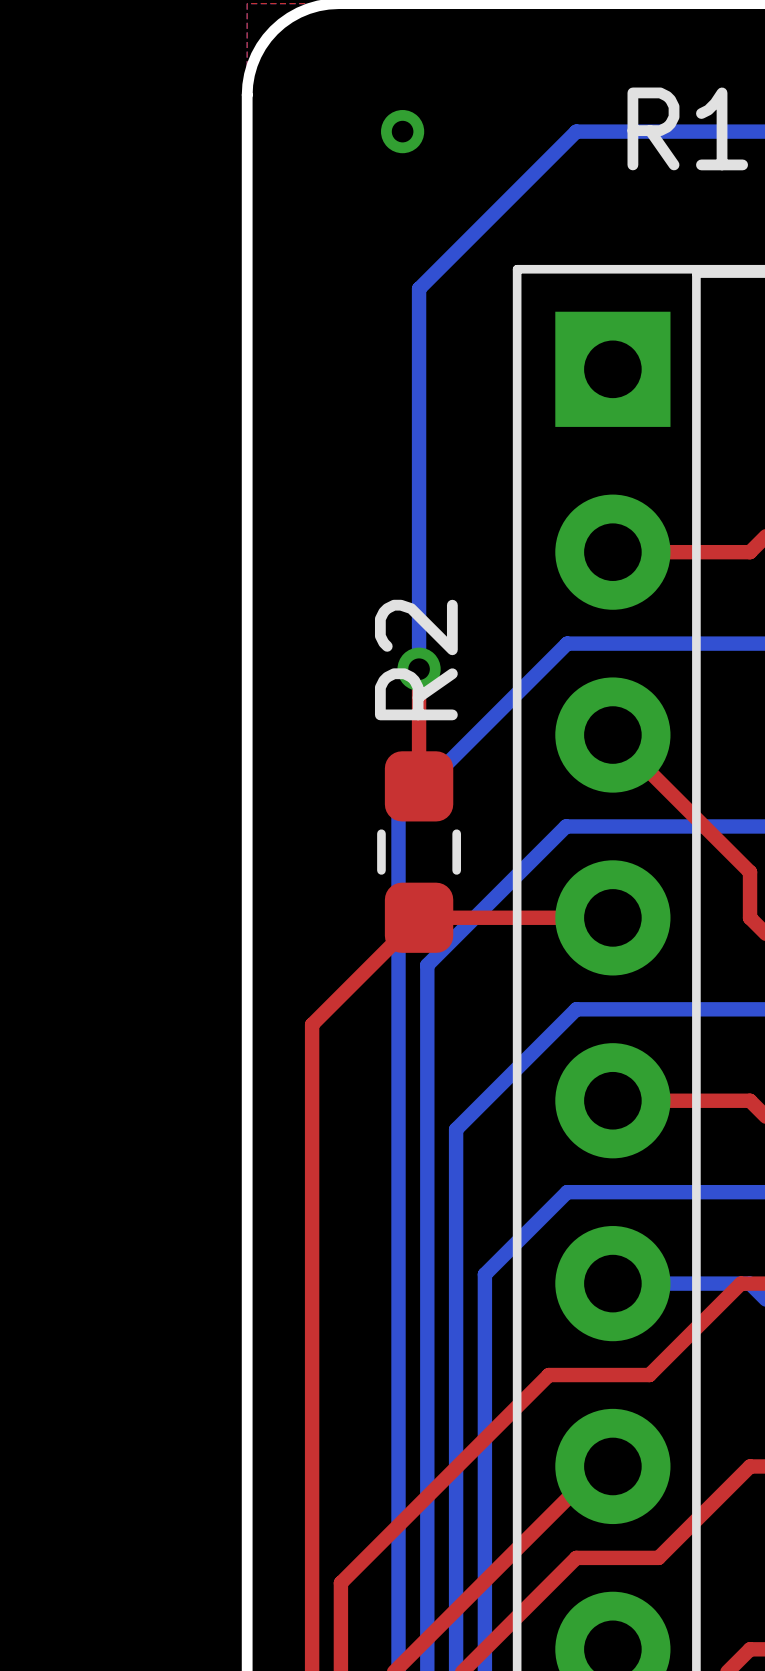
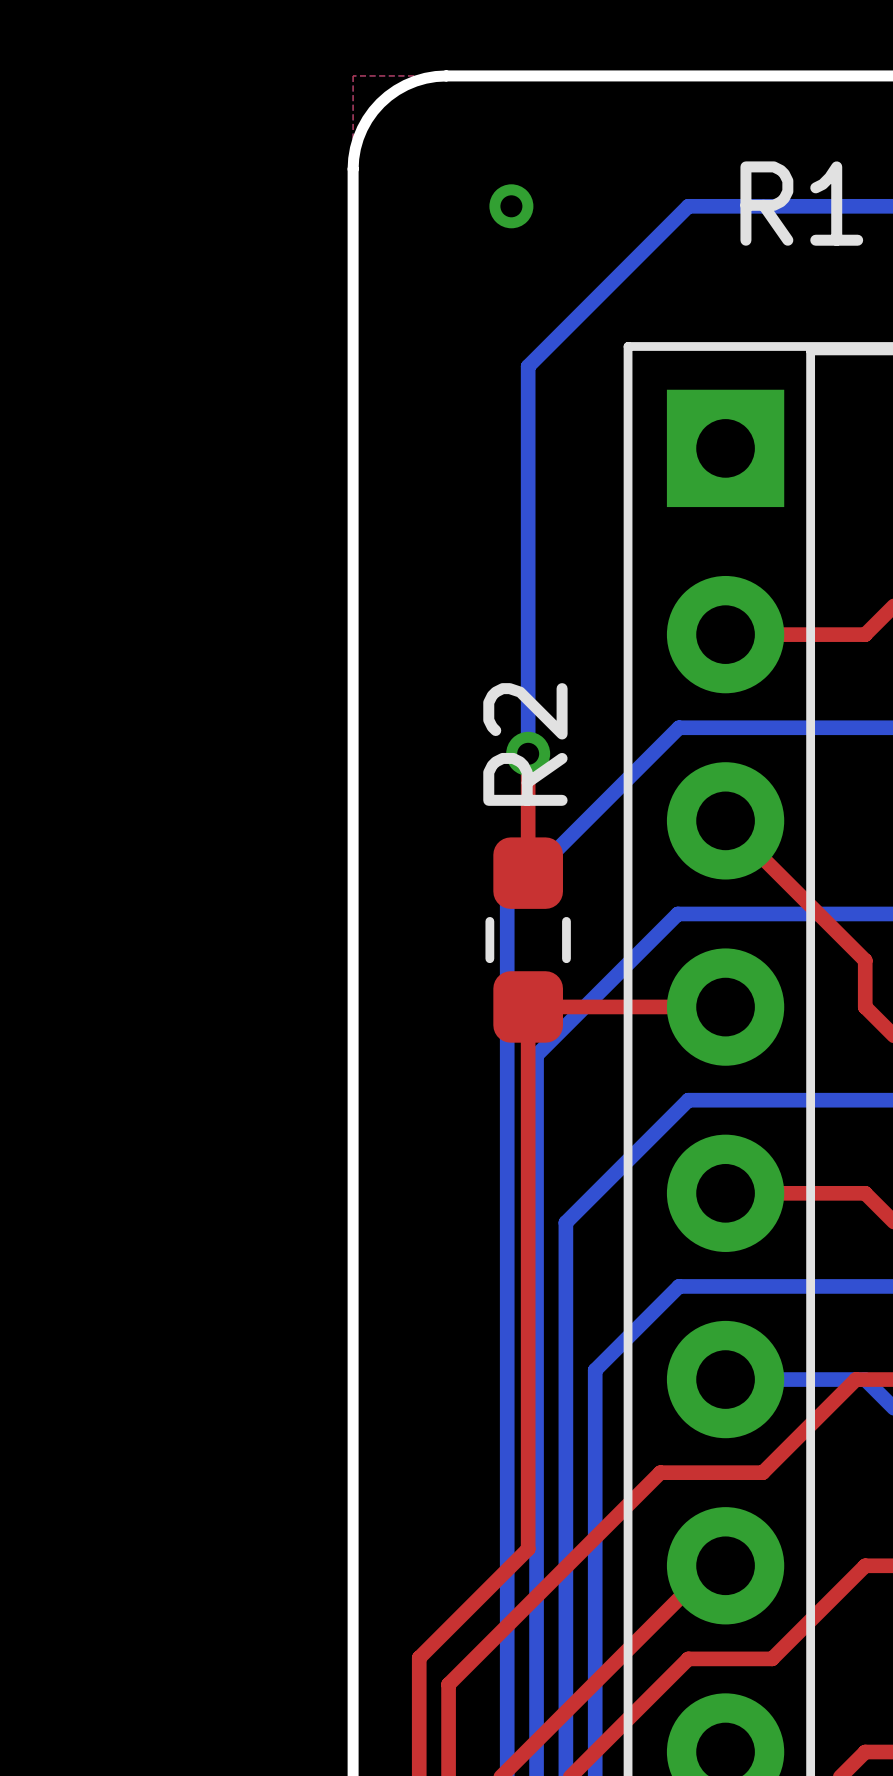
top track: (419, 917) (312, 1024) (312, 1556) -> (528, 1006) (528, 1549) (419, 1657)

